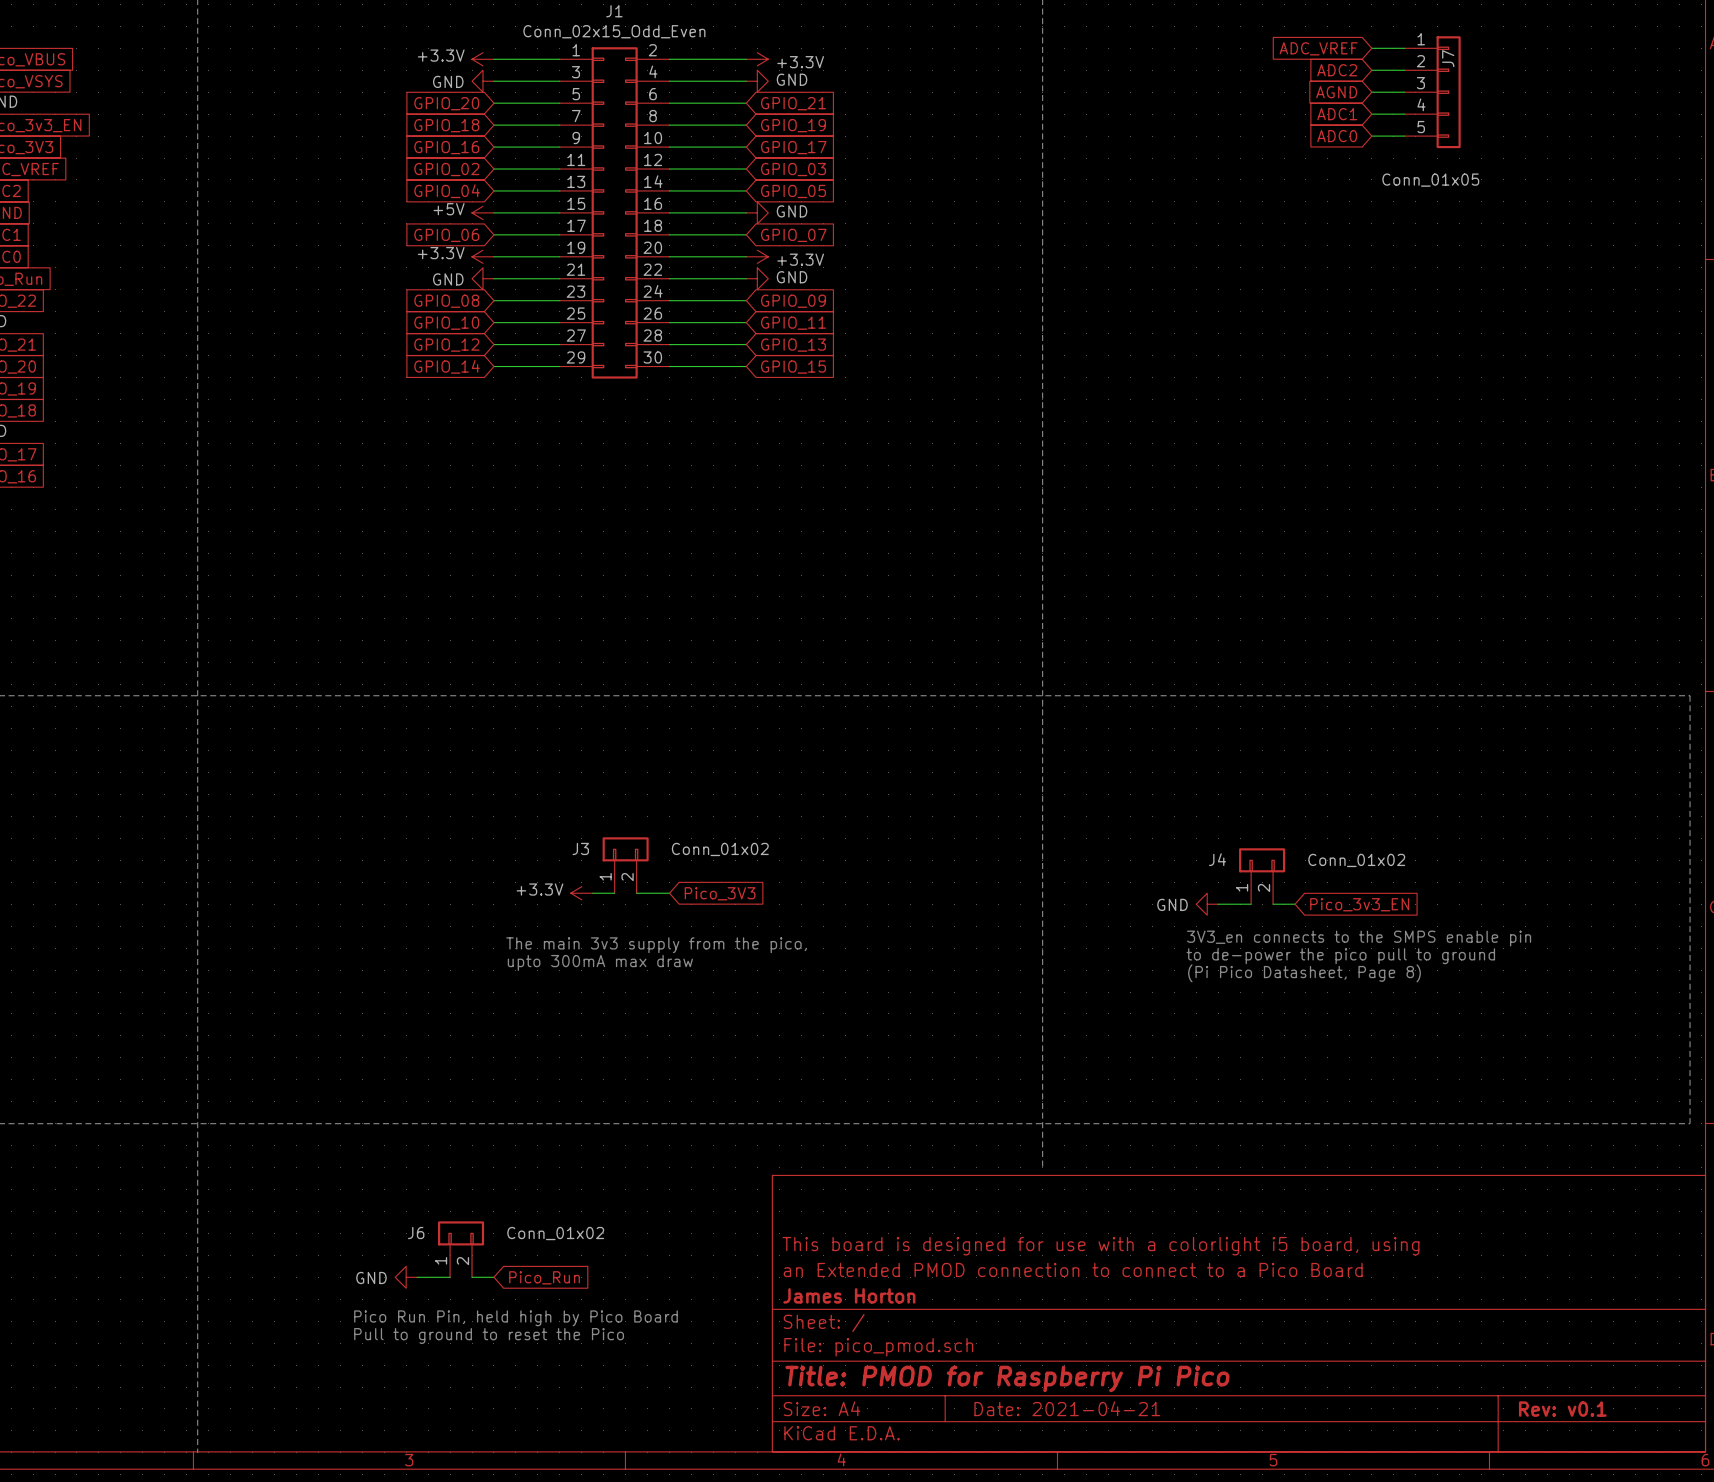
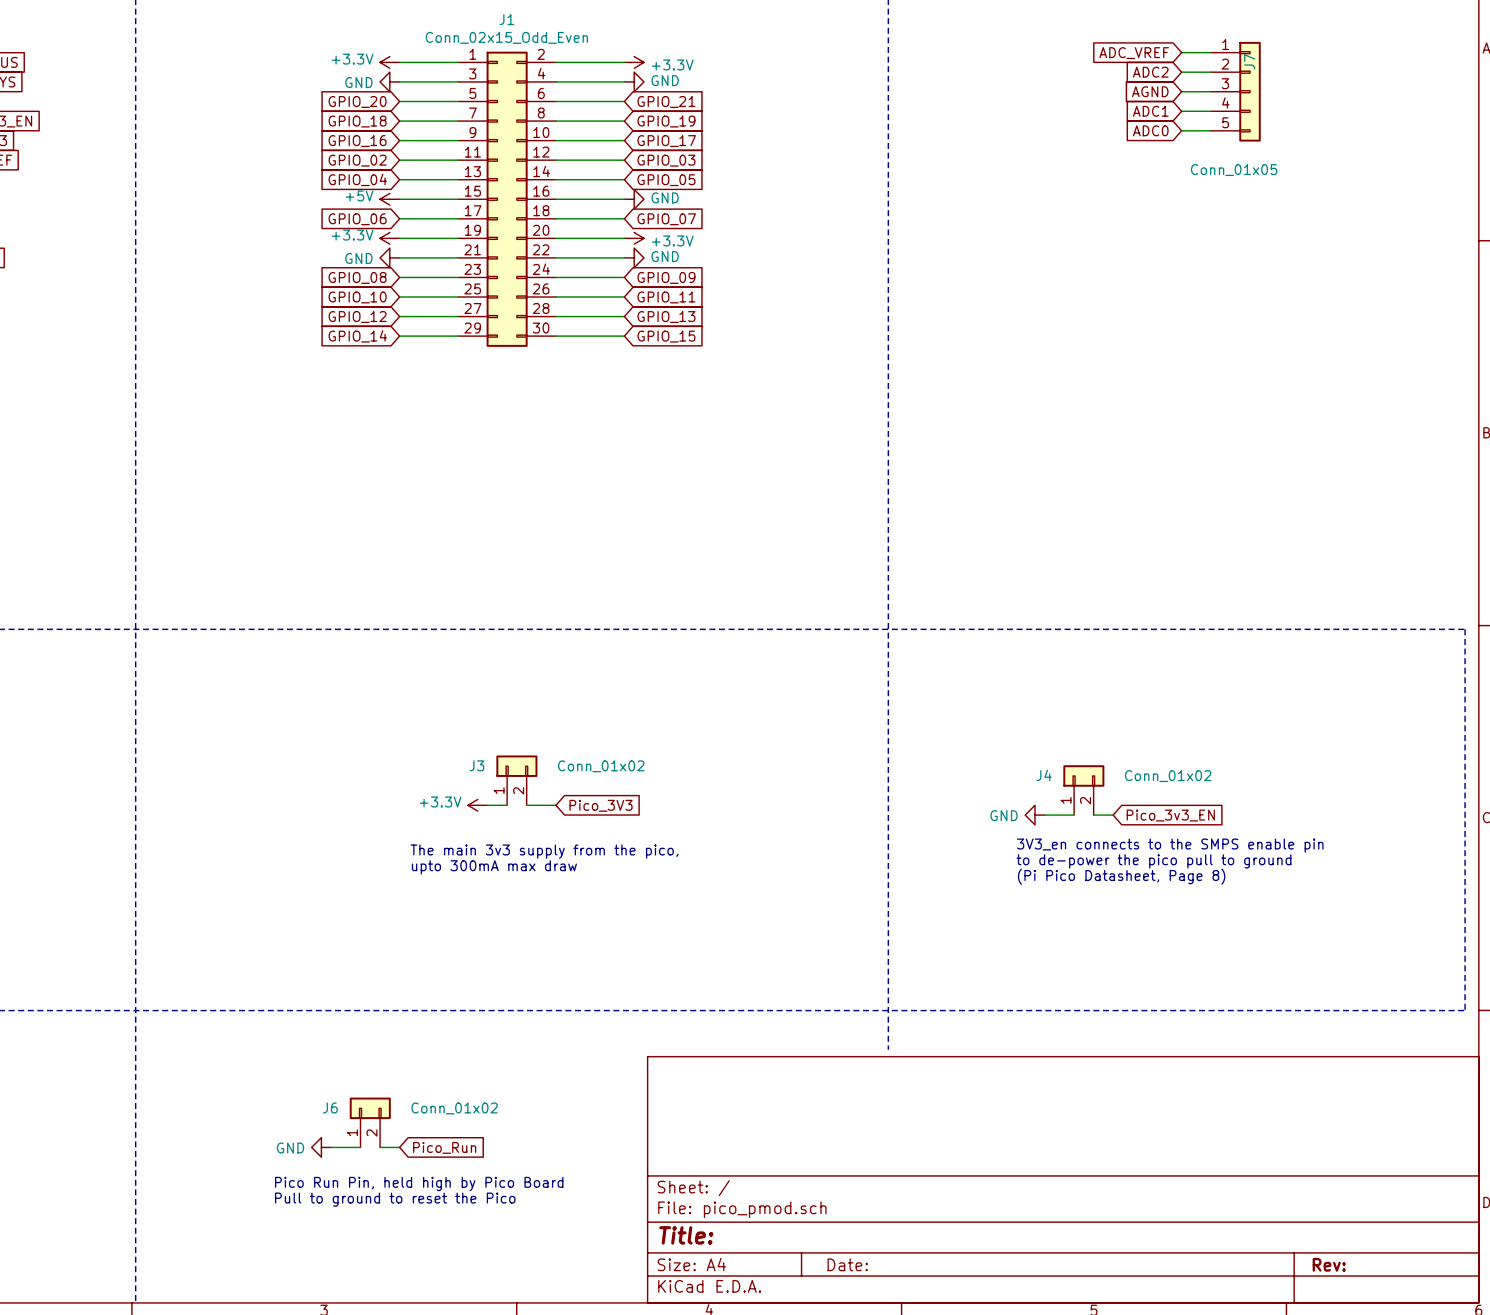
title block: This board is designed for use with a colorlight i5 board, using (1100, 1246) -> none
title block: an Extended PMOD connection to connect to a Pico Board (1073, 1269) -> none
title block: James Horton (849, 1295) -> none
title block: Title: PMOD for Raspberry Pi Pico (1007, 1378) -> Title: (686, 1235)
title block: Date: 2021-04-21 (1067, 1408) -> Date: (847, 1264)
title block: Rev: v0.1 (1562, 1409) -> Rev: (1329, 1264)

